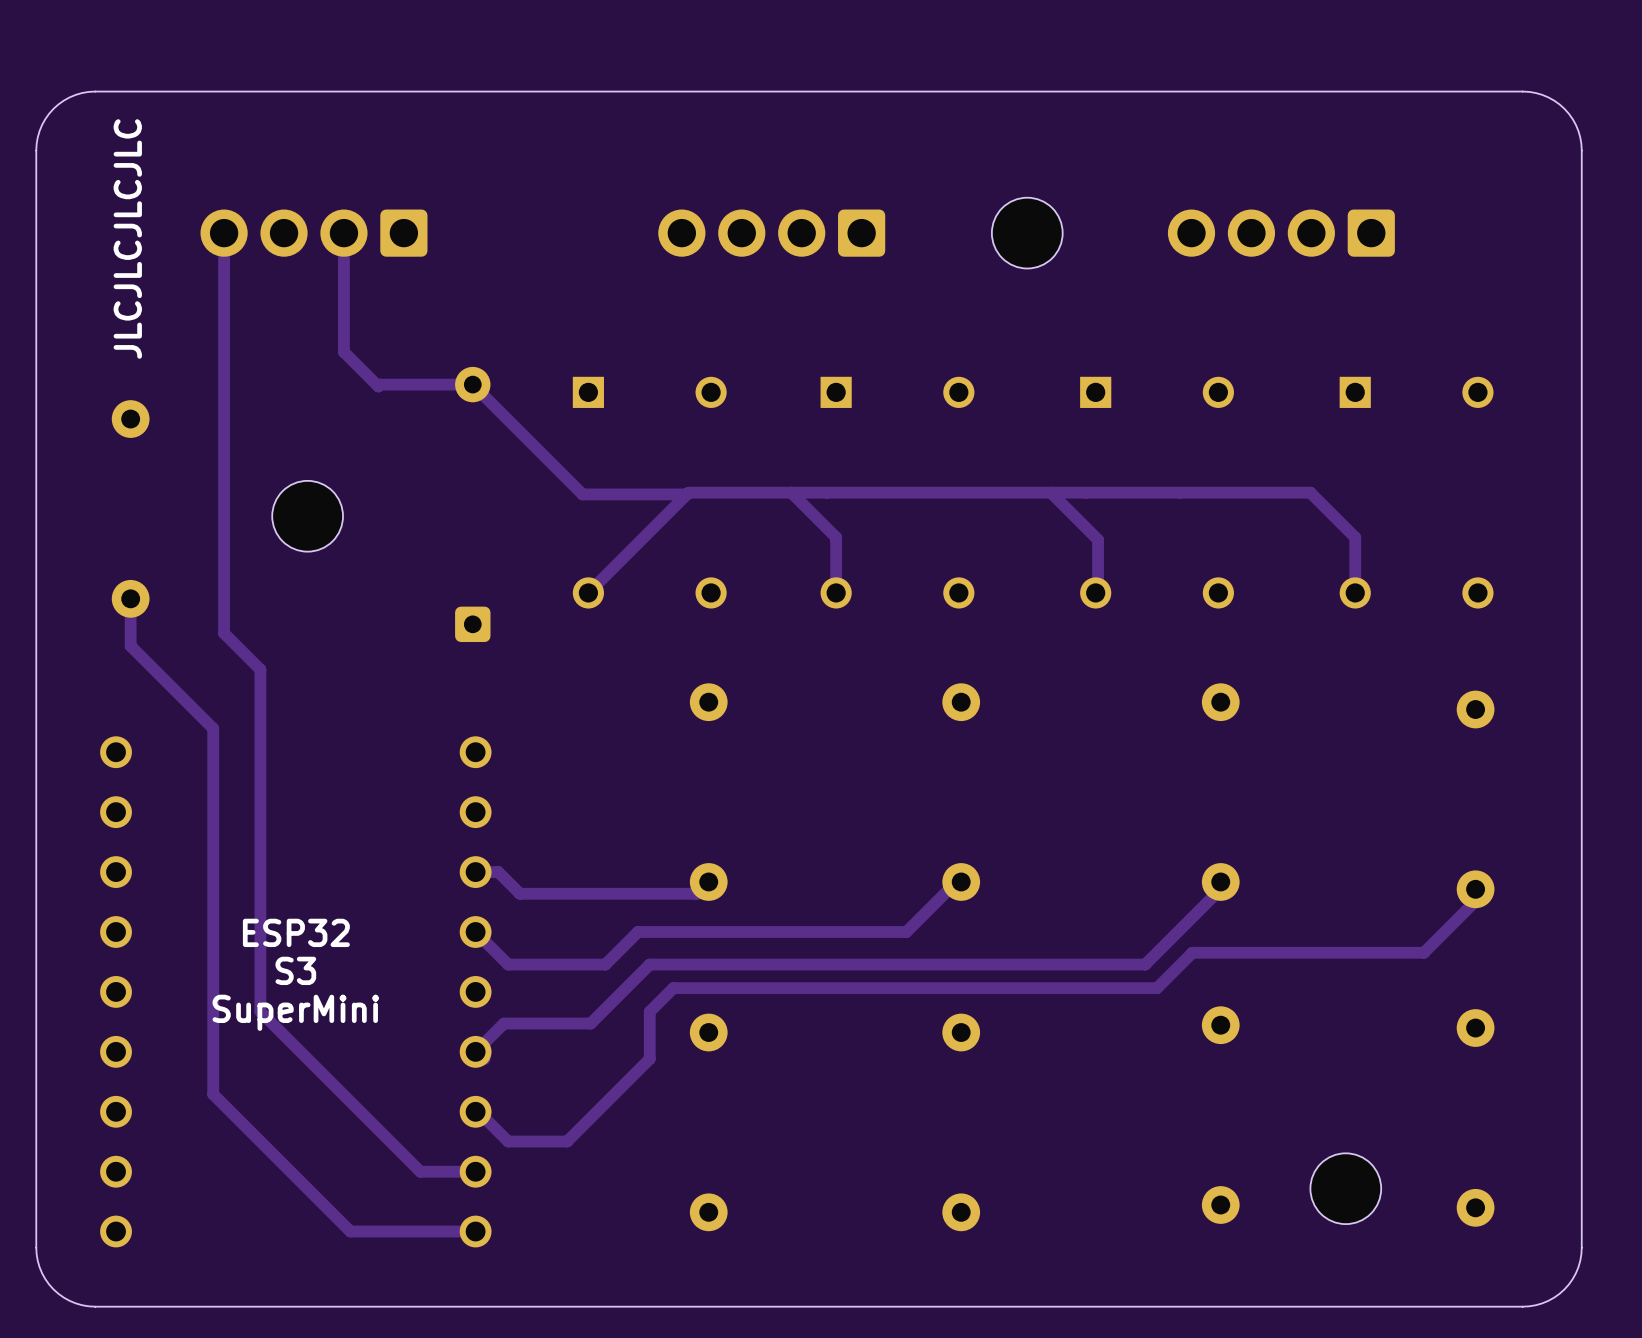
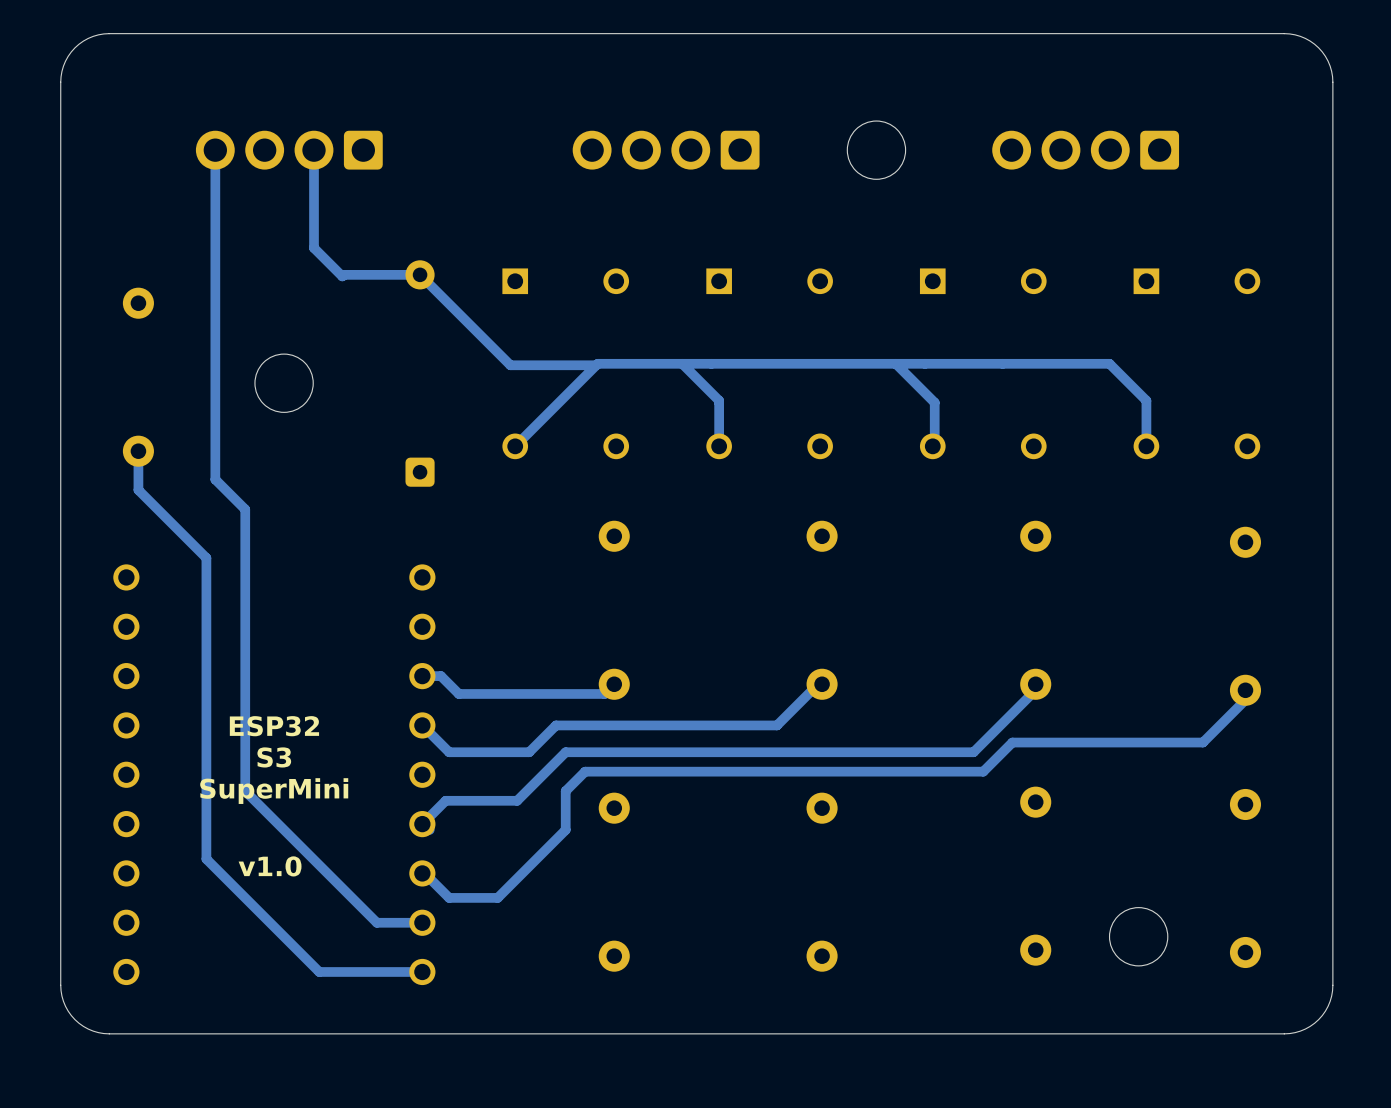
text: JLCJLCJLCJLC (127, 239) -> none
text: none -> v1.0 (270, 866)

